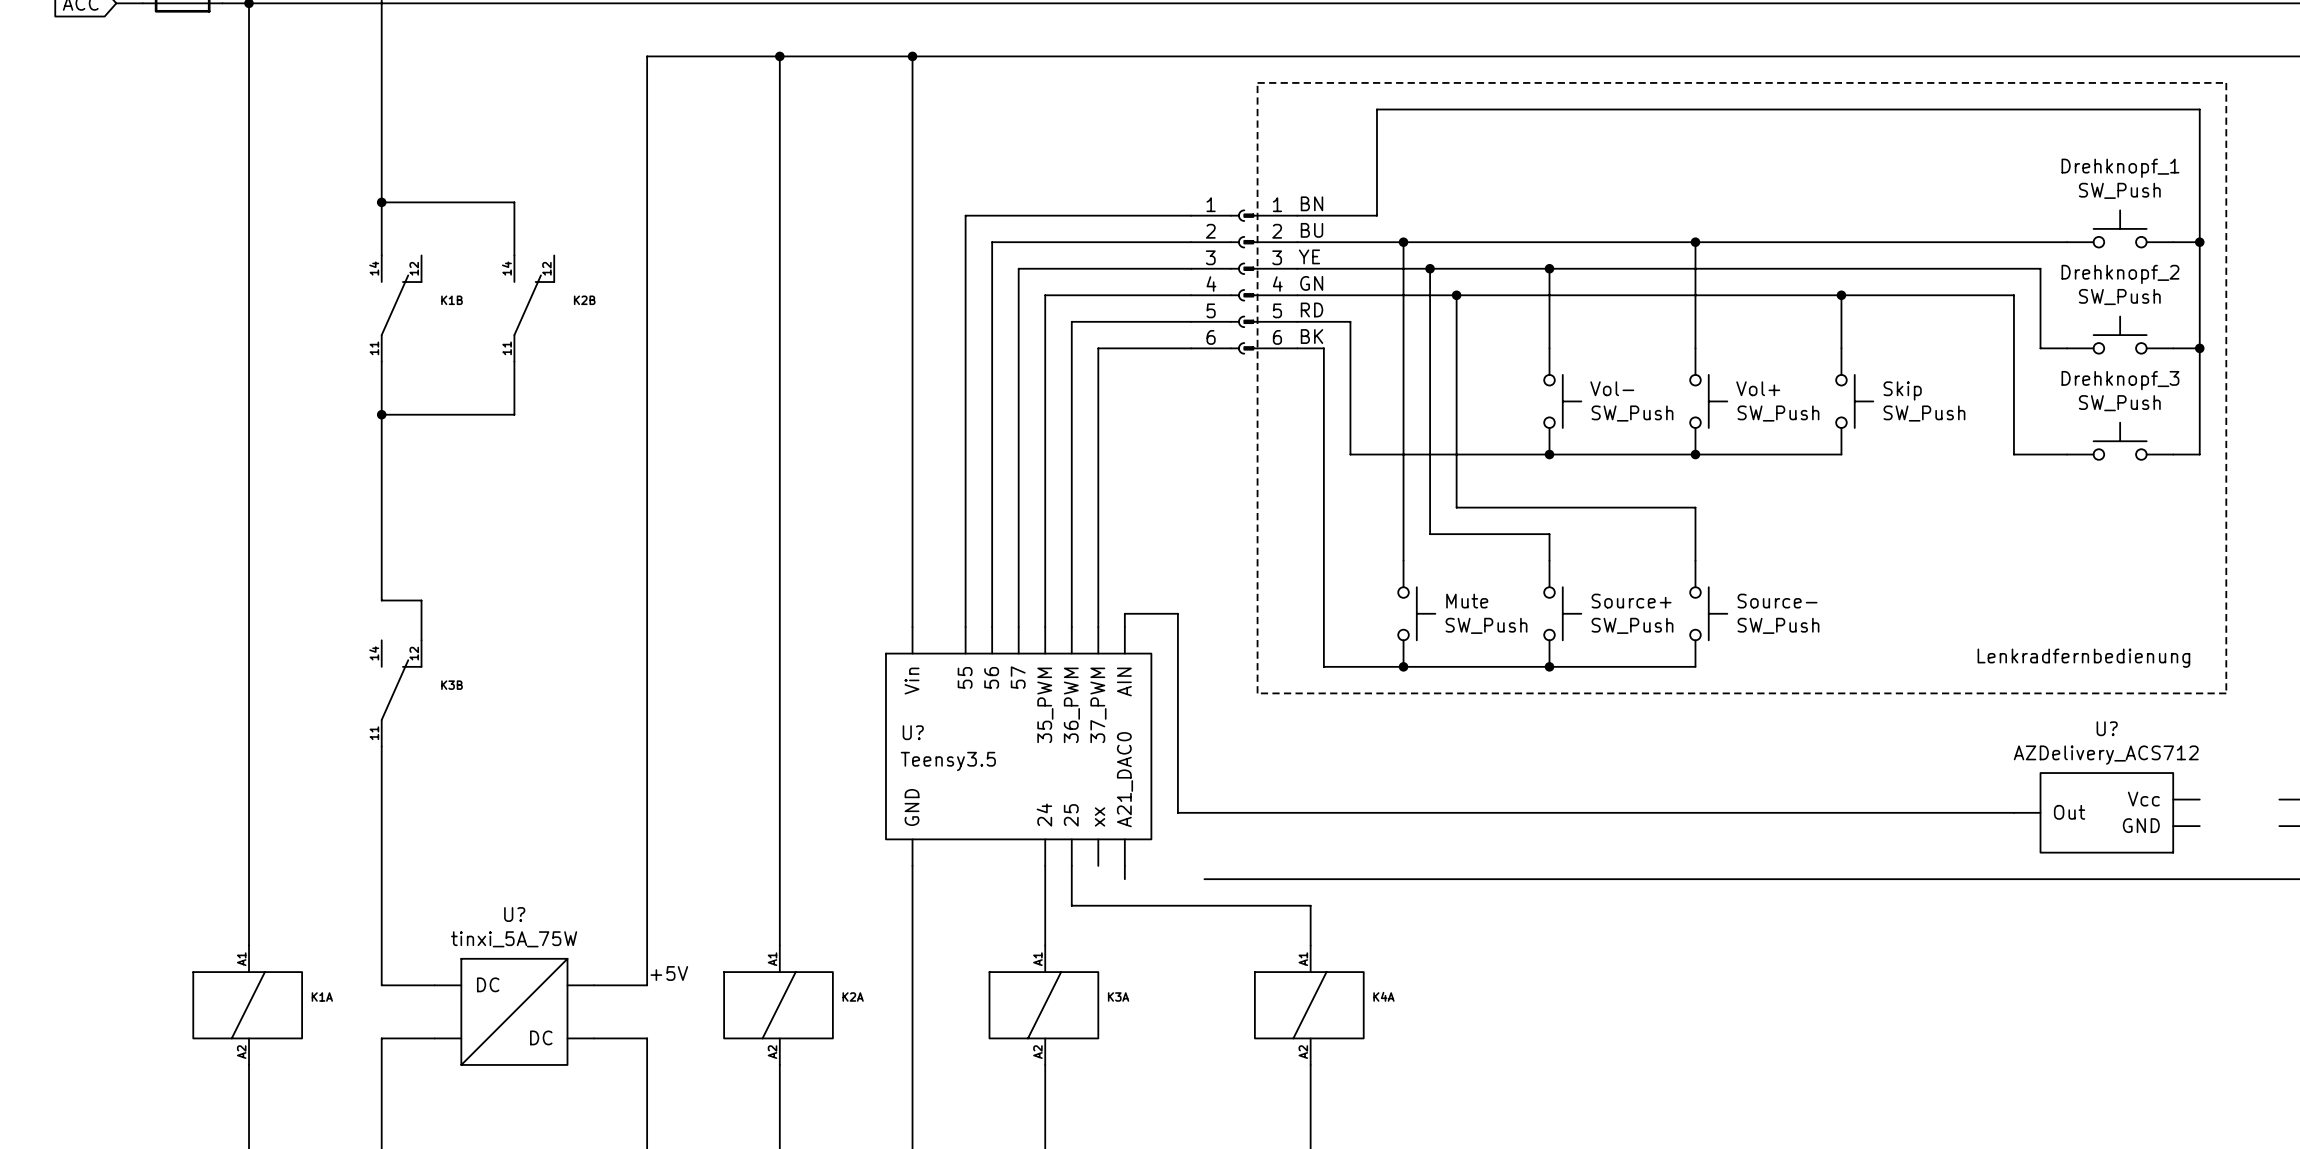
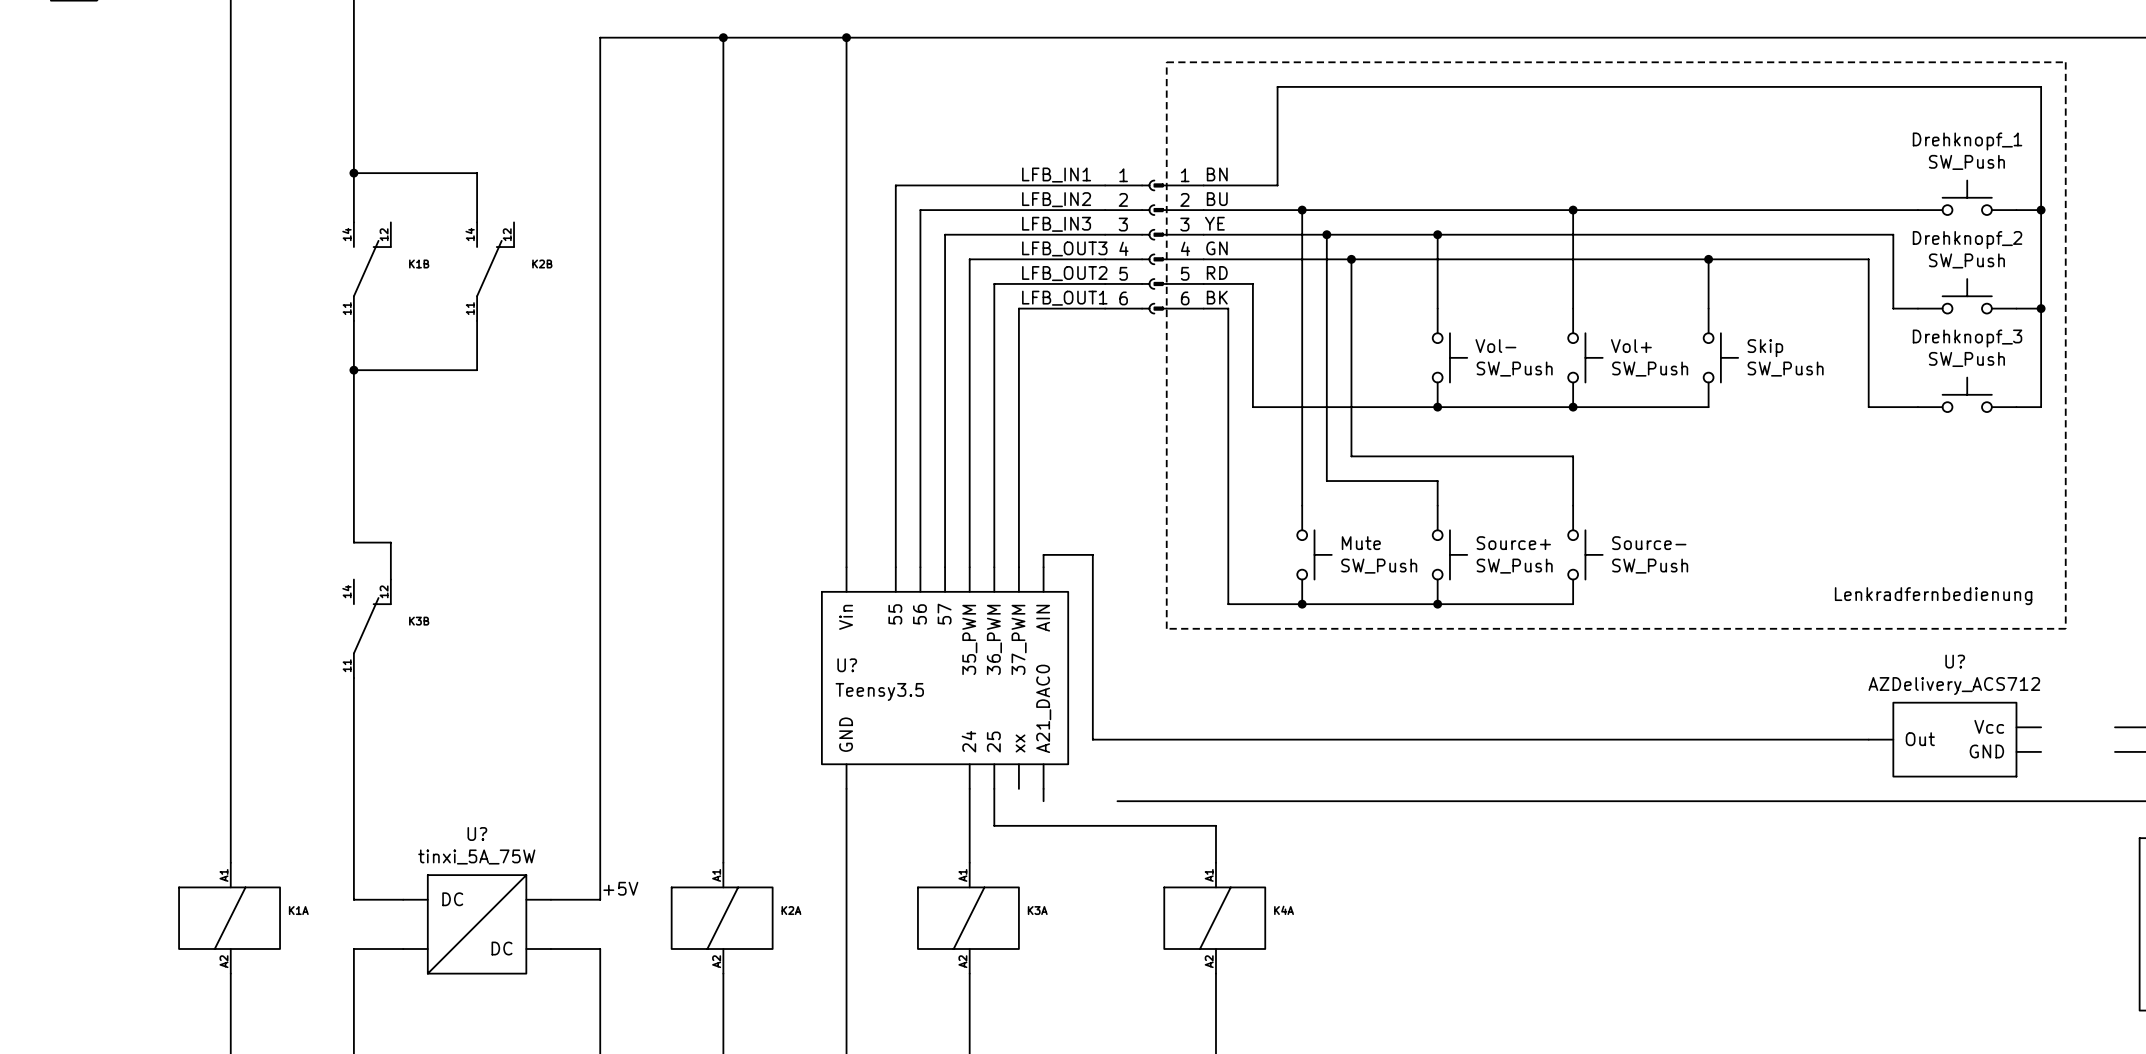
label: none -> LFB_IN1 (1056, 175)
label: none -> LFB_IN2 (1056, 199)
label: none -> LFB_IN3 (1056, 224)
label: none -> LFB_OUT3 (1064, 248)
label: none -> LFB_OUT2 (1064, 273)
label: none -> LFB_OUT1 (1064, 298)

